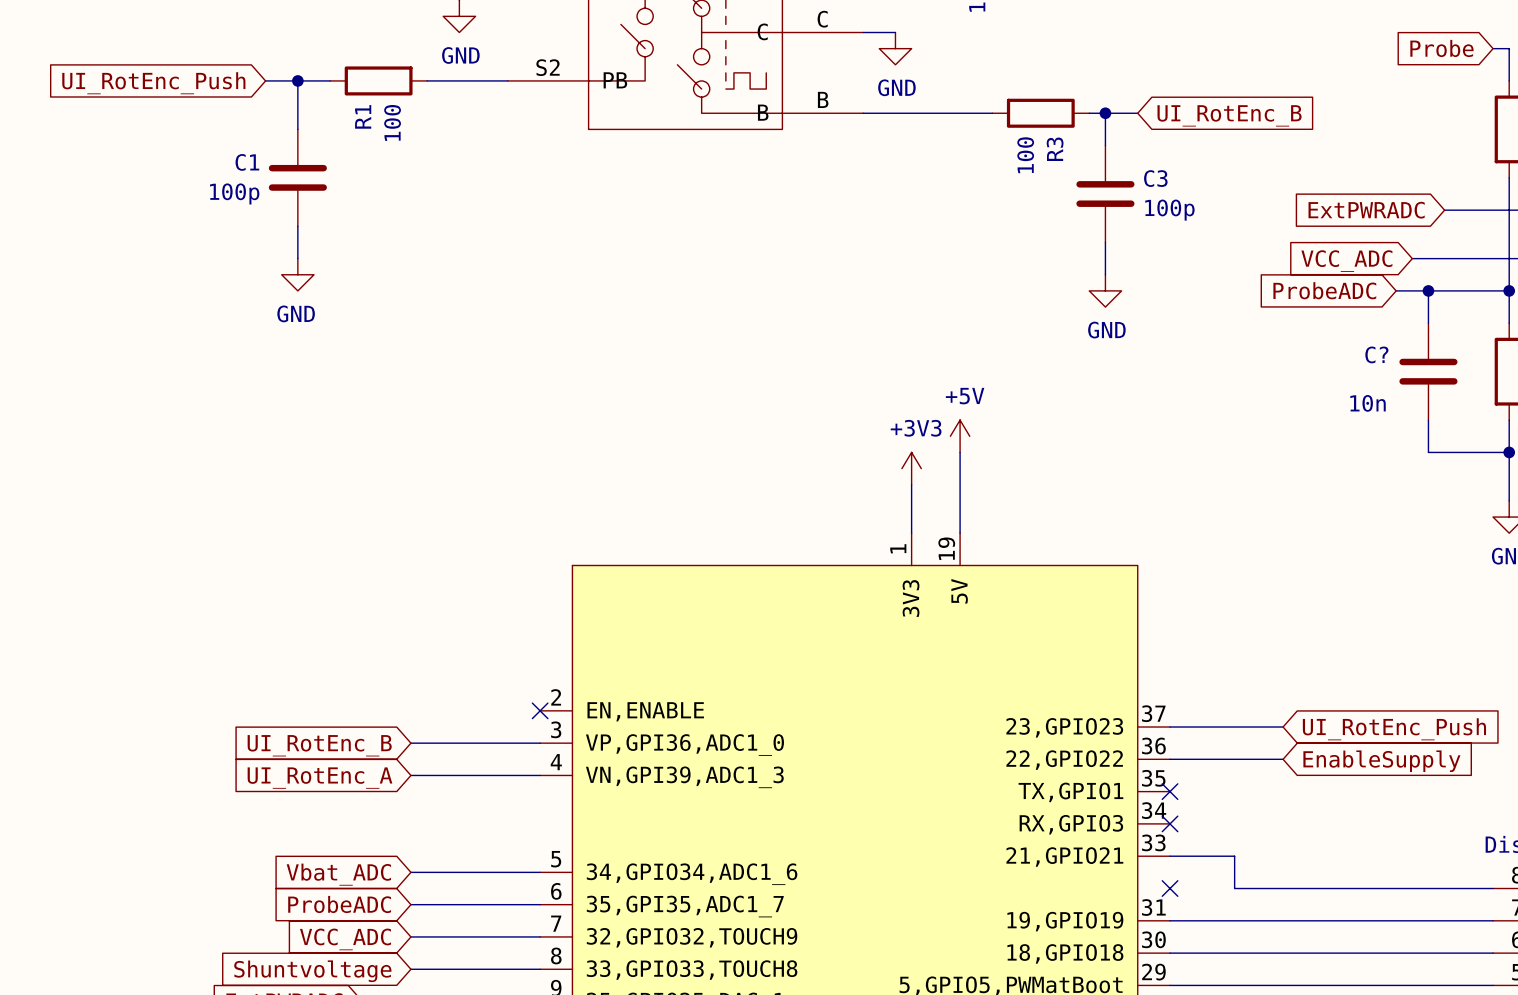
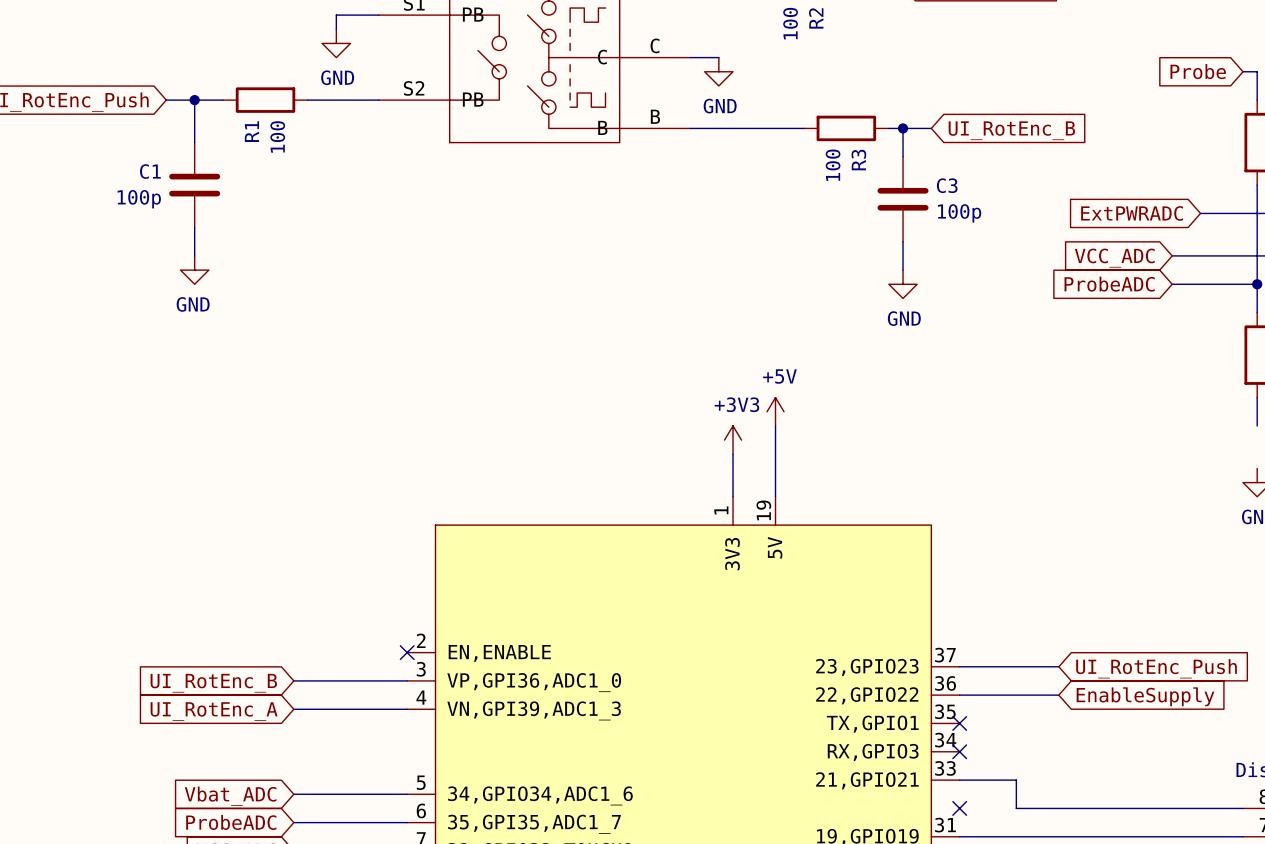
global label position: ProbeADC (1324, 290) -> ProbeADC (1109, 284)
wire: (1396, 290) (1412, 290) -> none
wire: (1428, 290) (1428, 323) -> none
junction: (1428, 290) -> none
C?: 10n (1428, 371) -> none
wire: (1428, 420) (1428, 452) (1509, 452) (1509, 500) -> none
junction: (1509, 452) -> none

